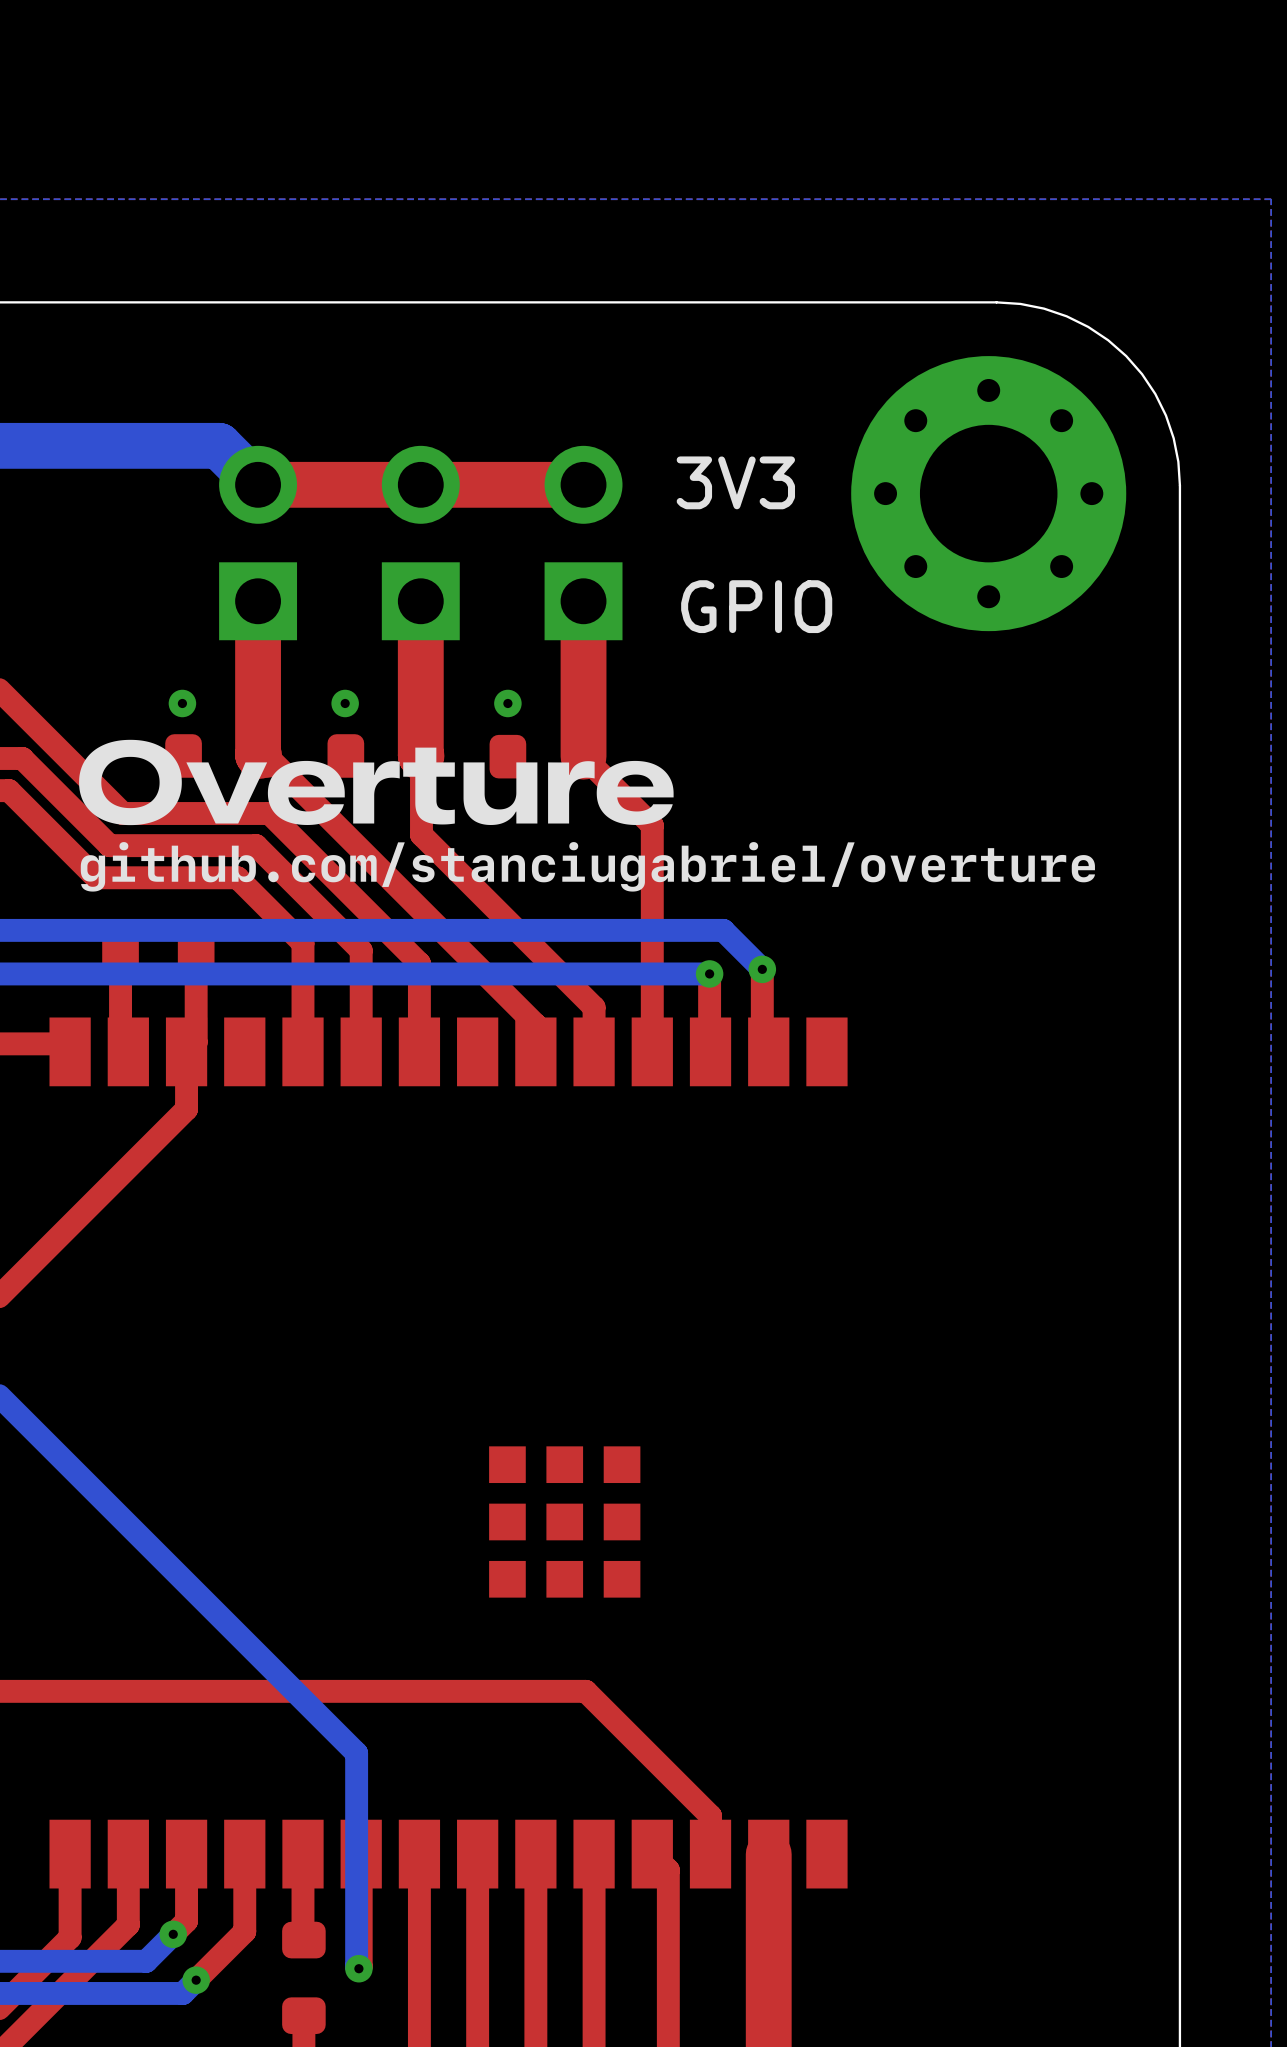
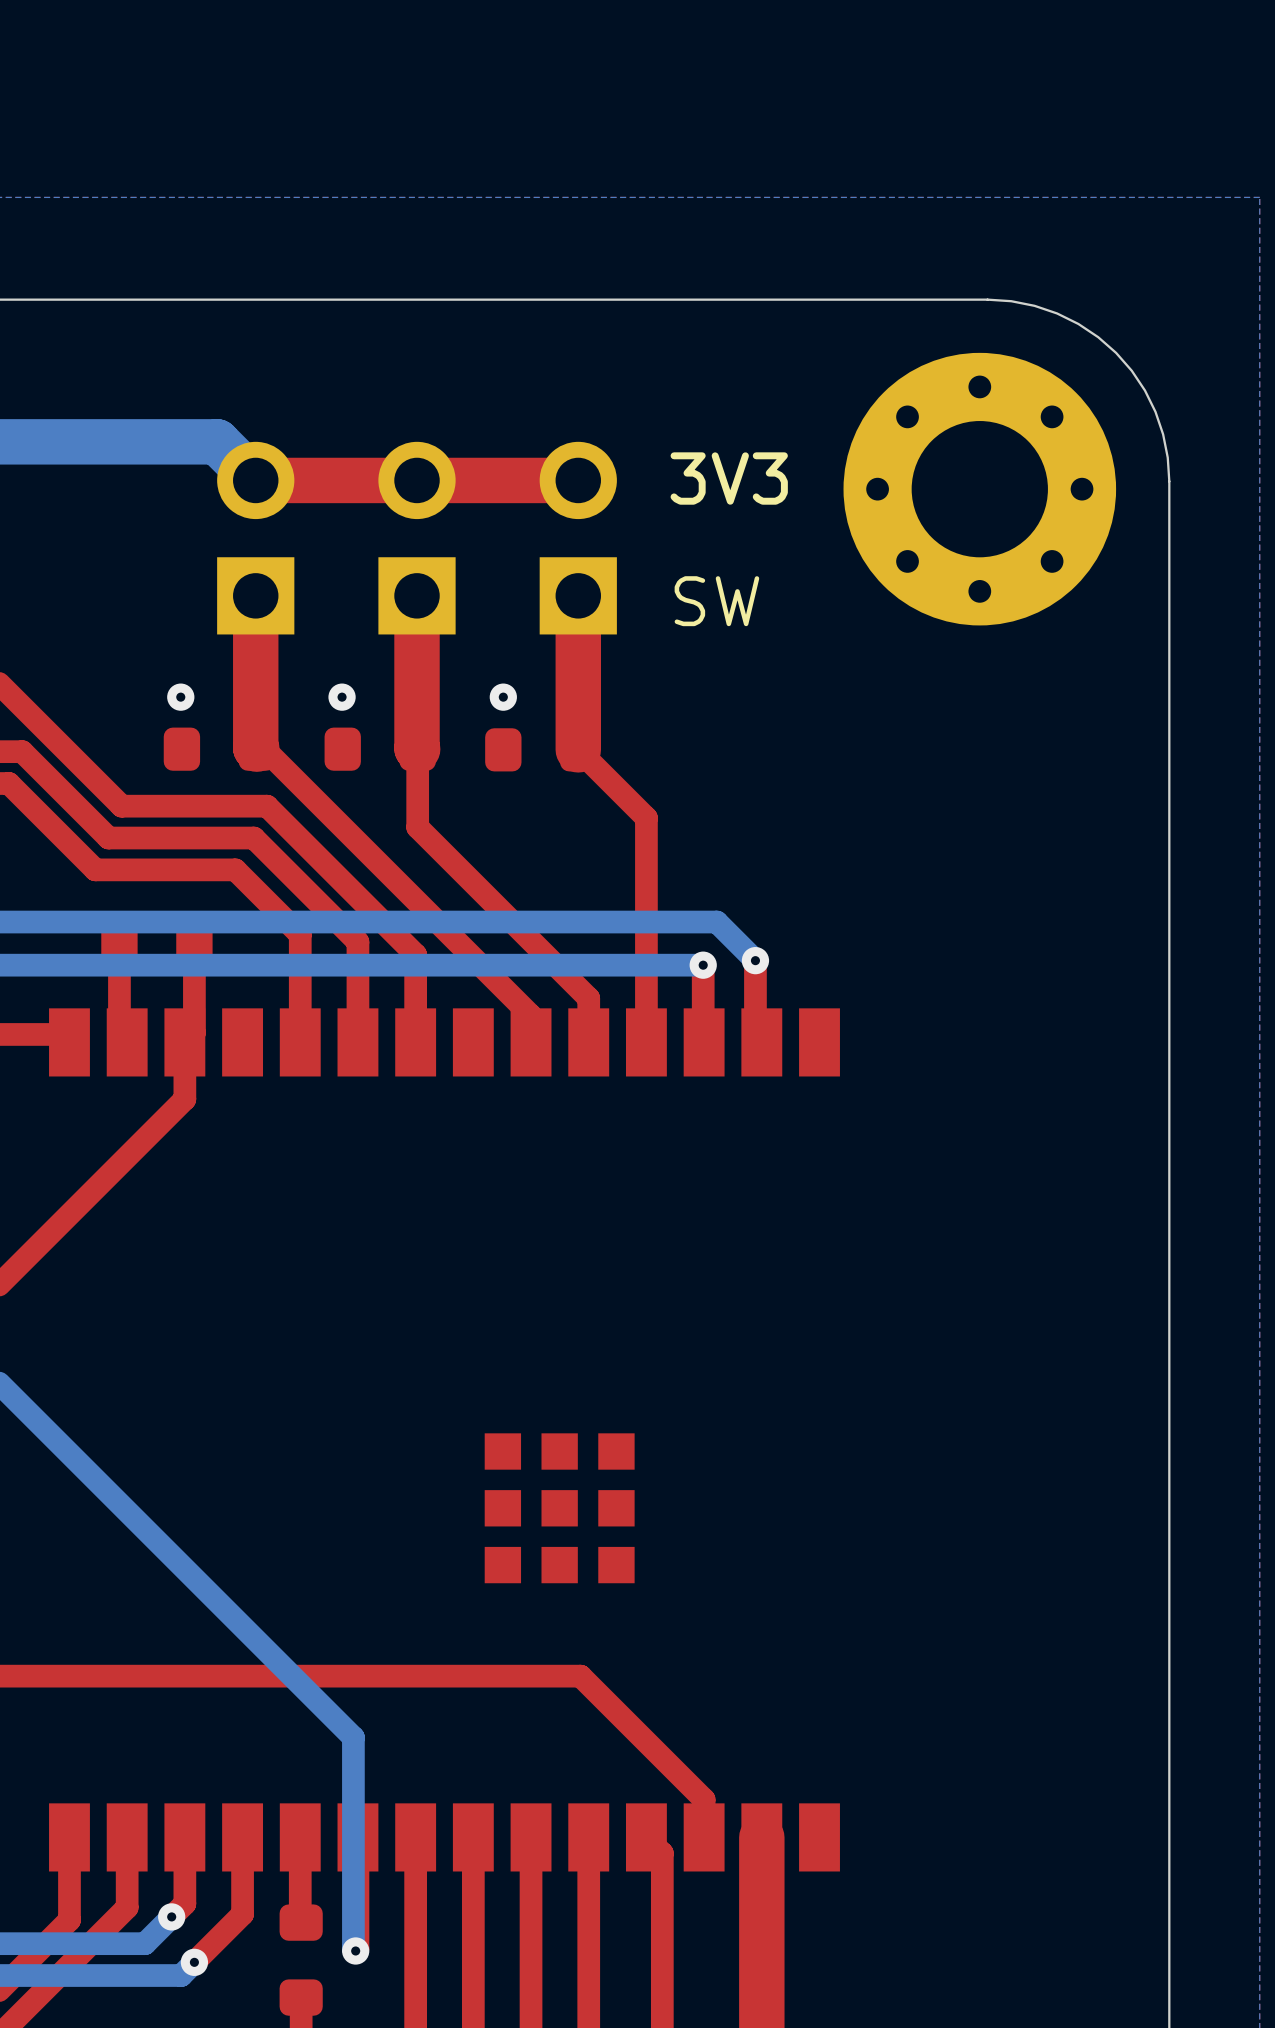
text: GPIO (756, 606) -> SW (716, 601)
drawing: [79, 739, 1095, 892] -> none

